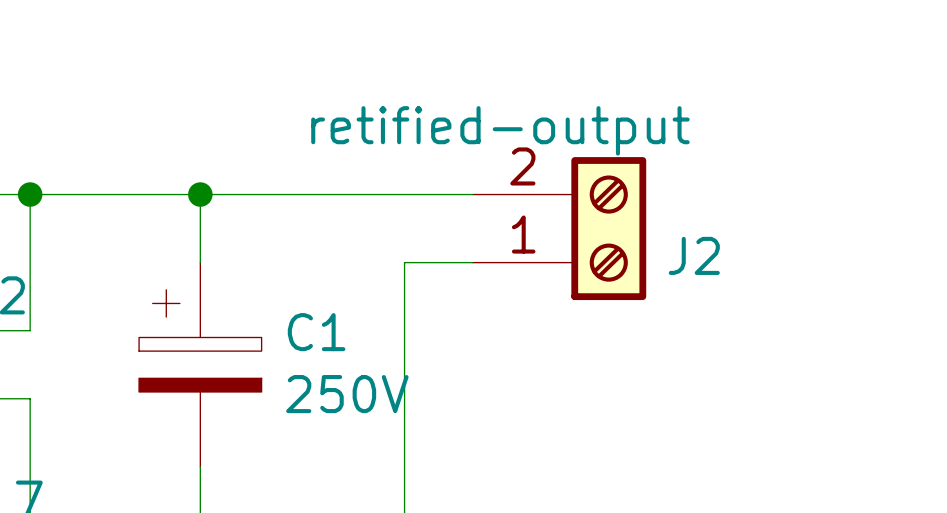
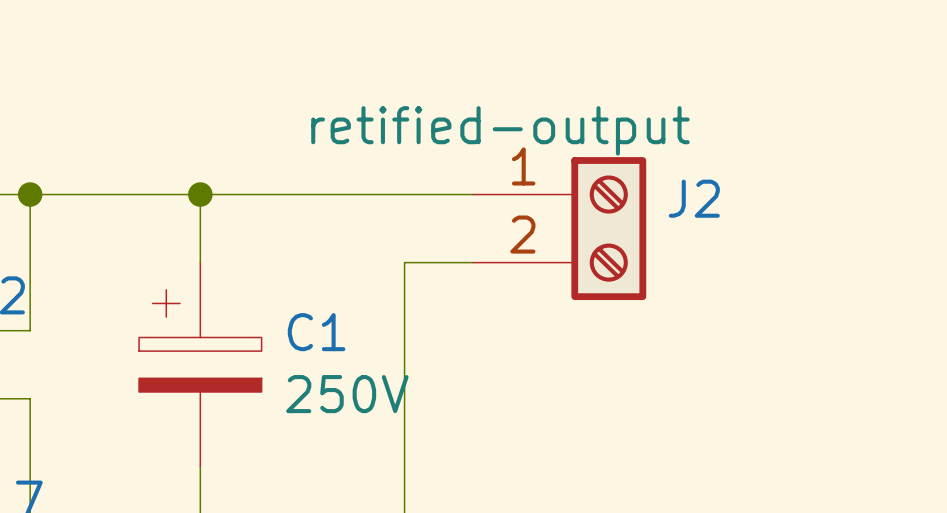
J2 flip: as is (608, 228) -> up-down (608, 228)

